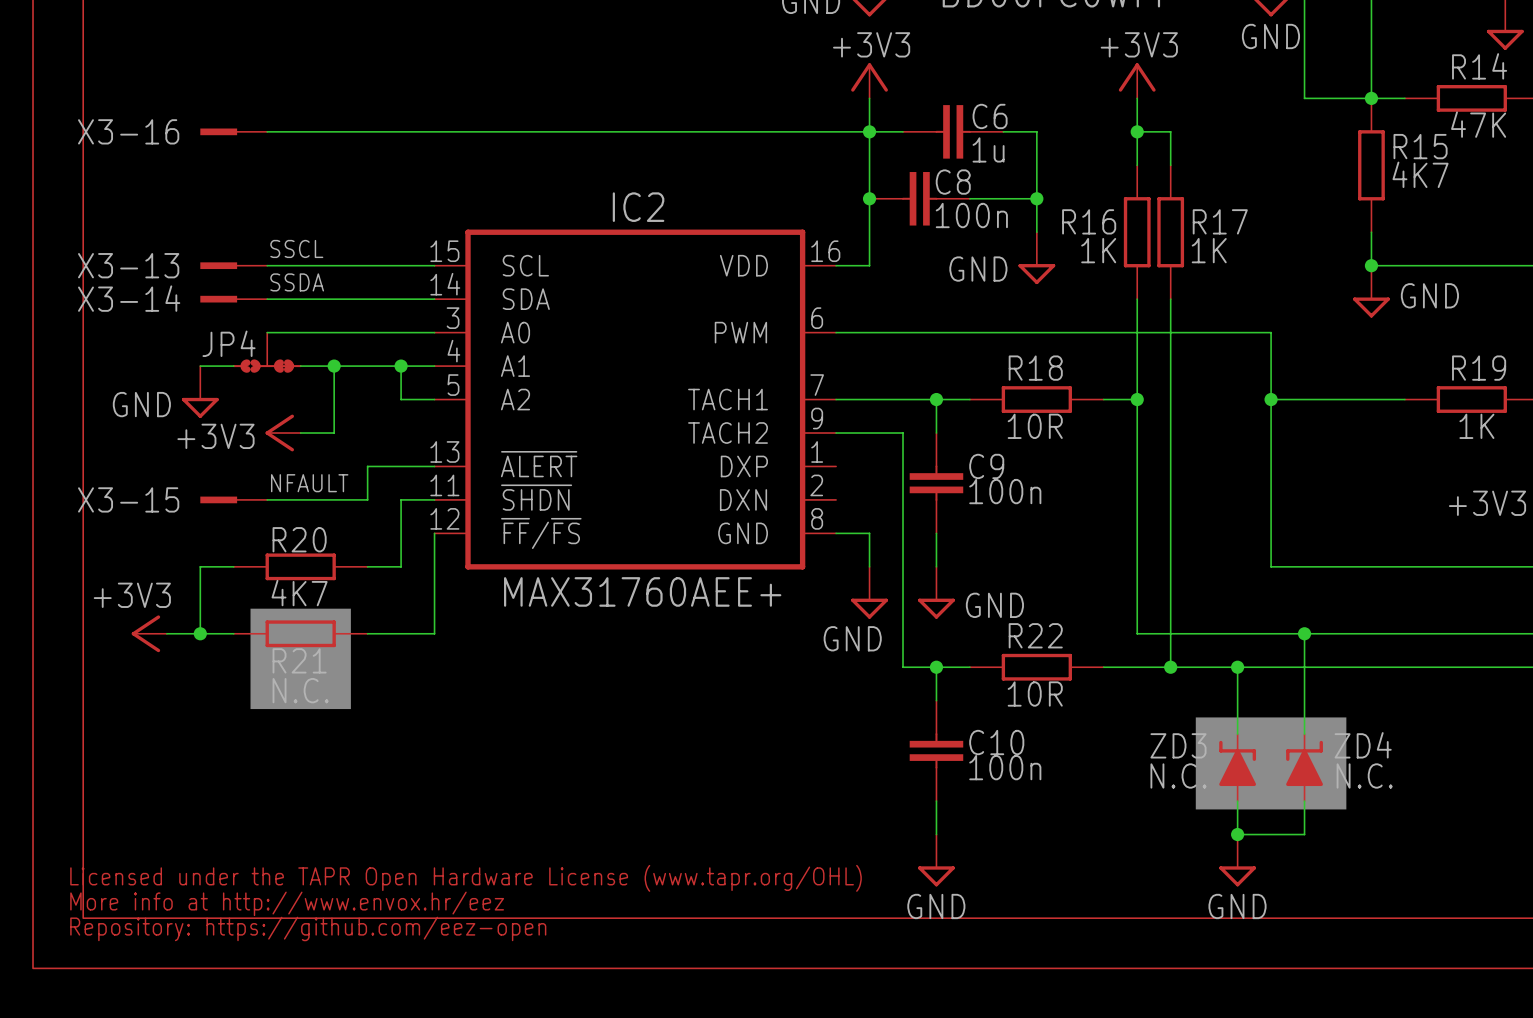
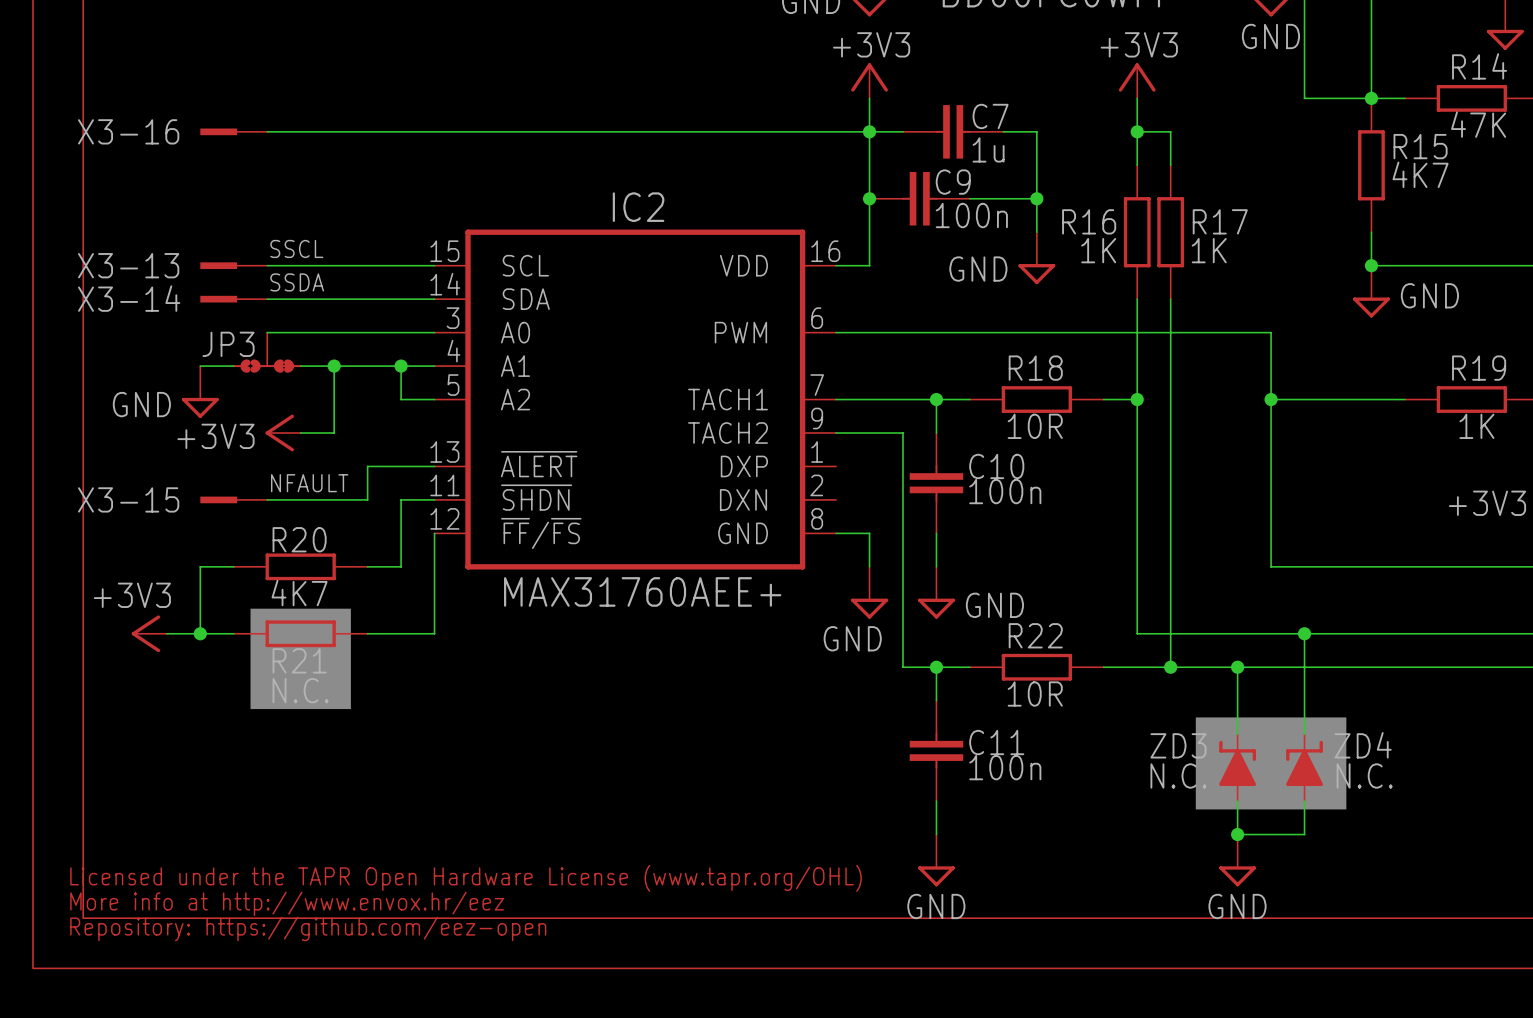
C6 name: C6 (990, 116) -> C7 (990, 116)
C8 name: C8 (953, 182) -> C9 (953, 182)
JP4 name: JP4 (229, 343) -> JP3 (228, 344)
C9 name: C9 (986, 466) -> C10 (996, 466)
C10 name: C10 (996, 742) -> C11 (996, 742)

